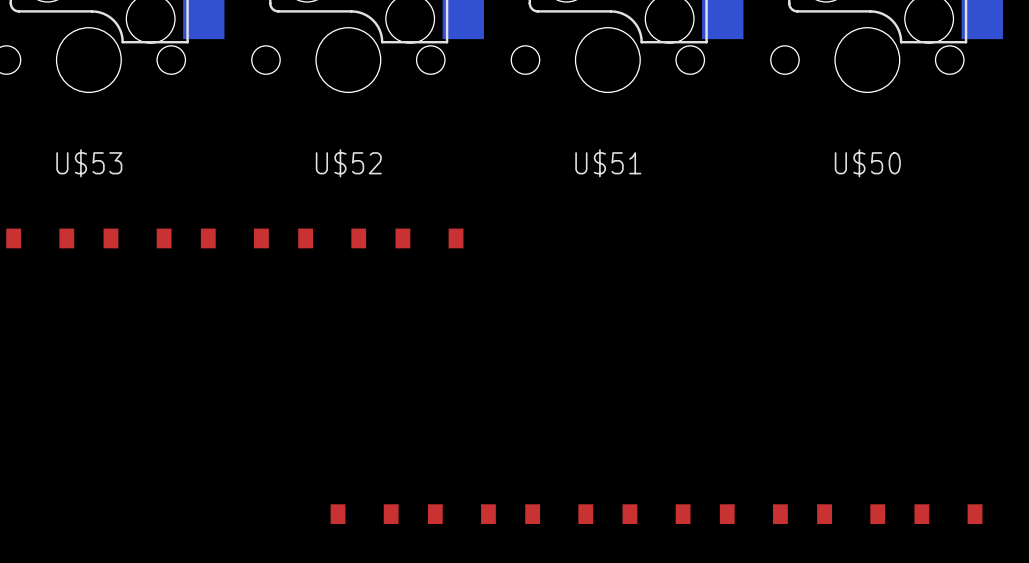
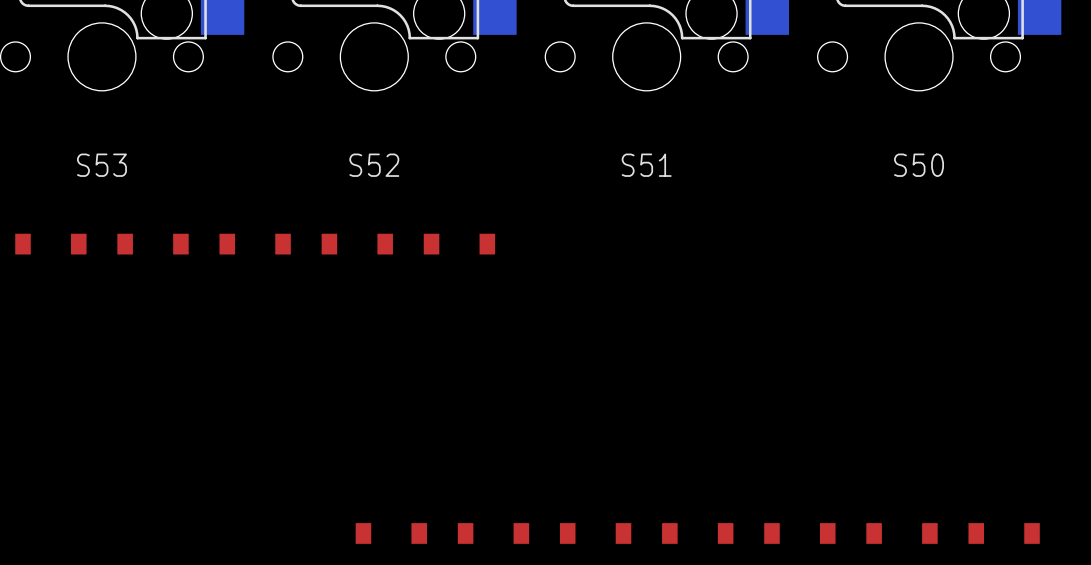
U$53 name: U$53 (89, 163) -> S53 (101, 165)
U$52 name: U$52 (348, 163) -> S52 (374, 165)
U$51 name: U$51 (608, 163) -> S51 (646, 165)
U$50 name: U$50 (867, 163) -> S50 (919, 165)

